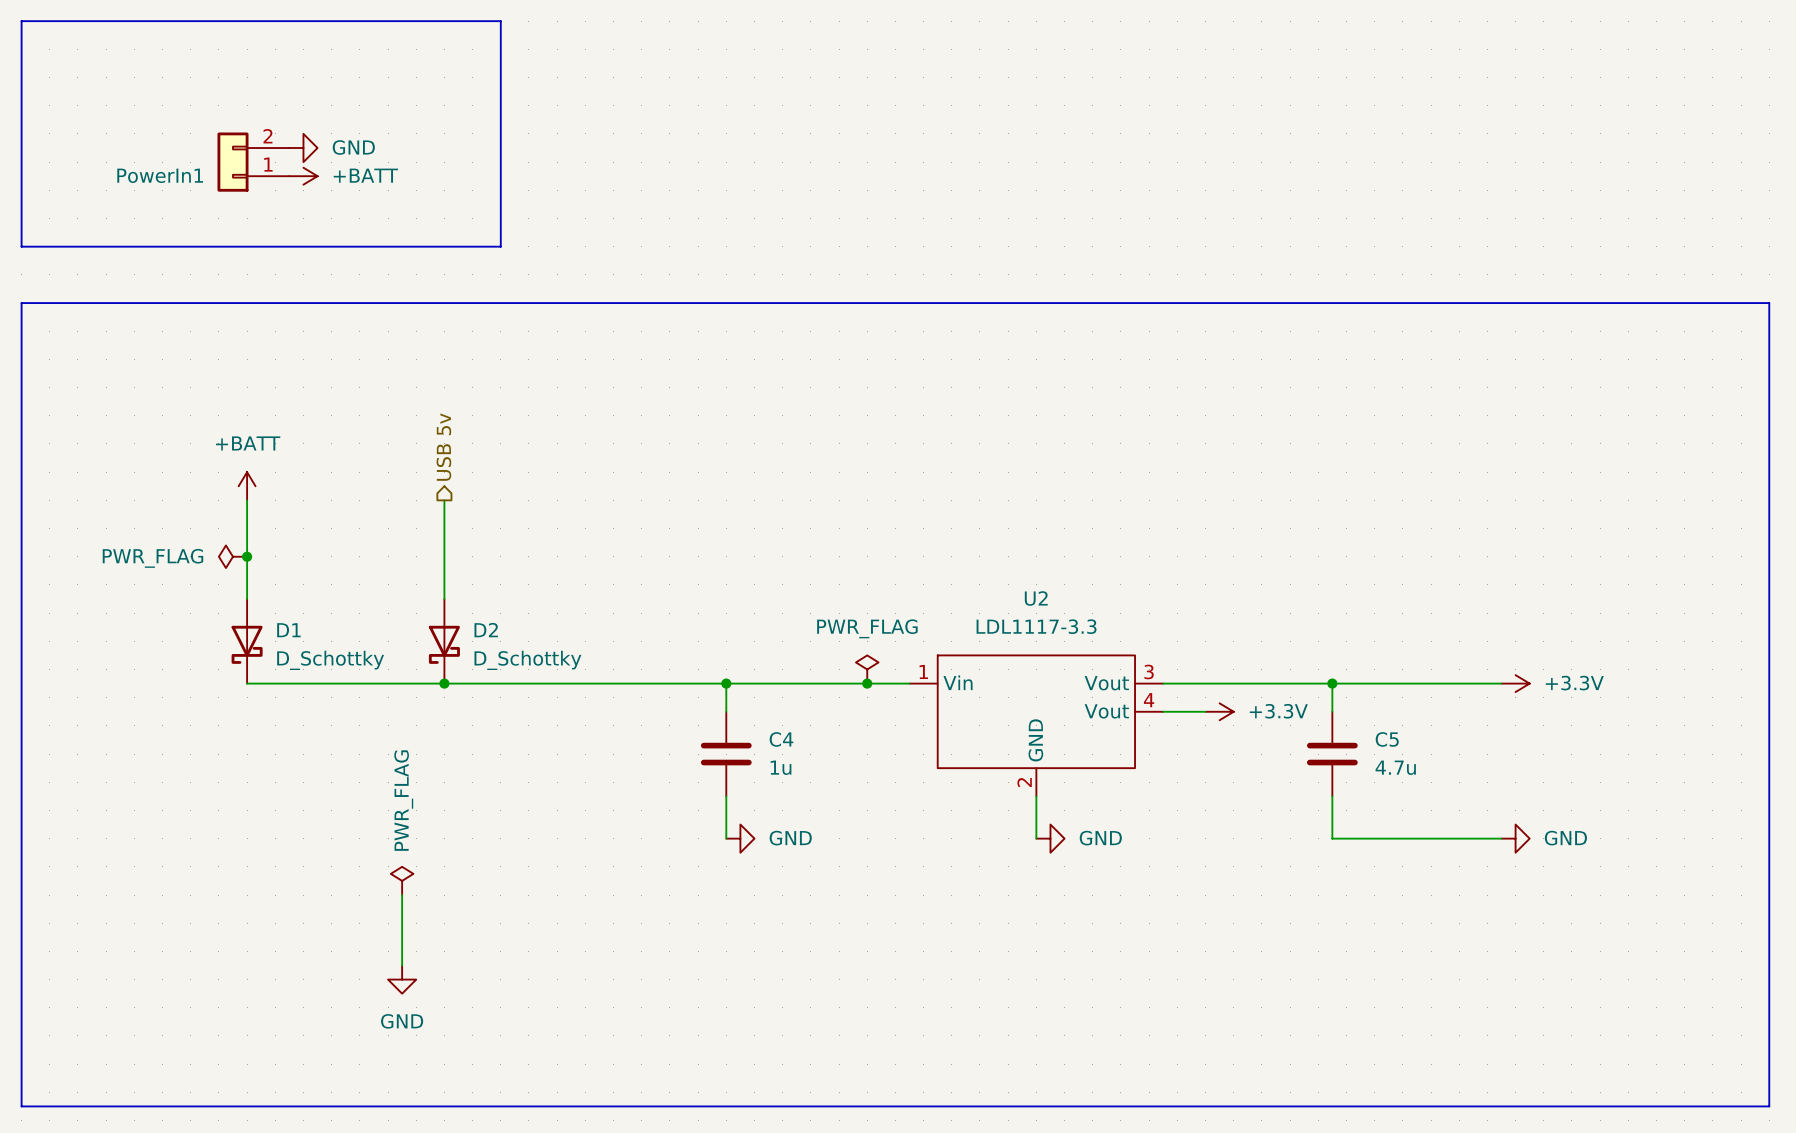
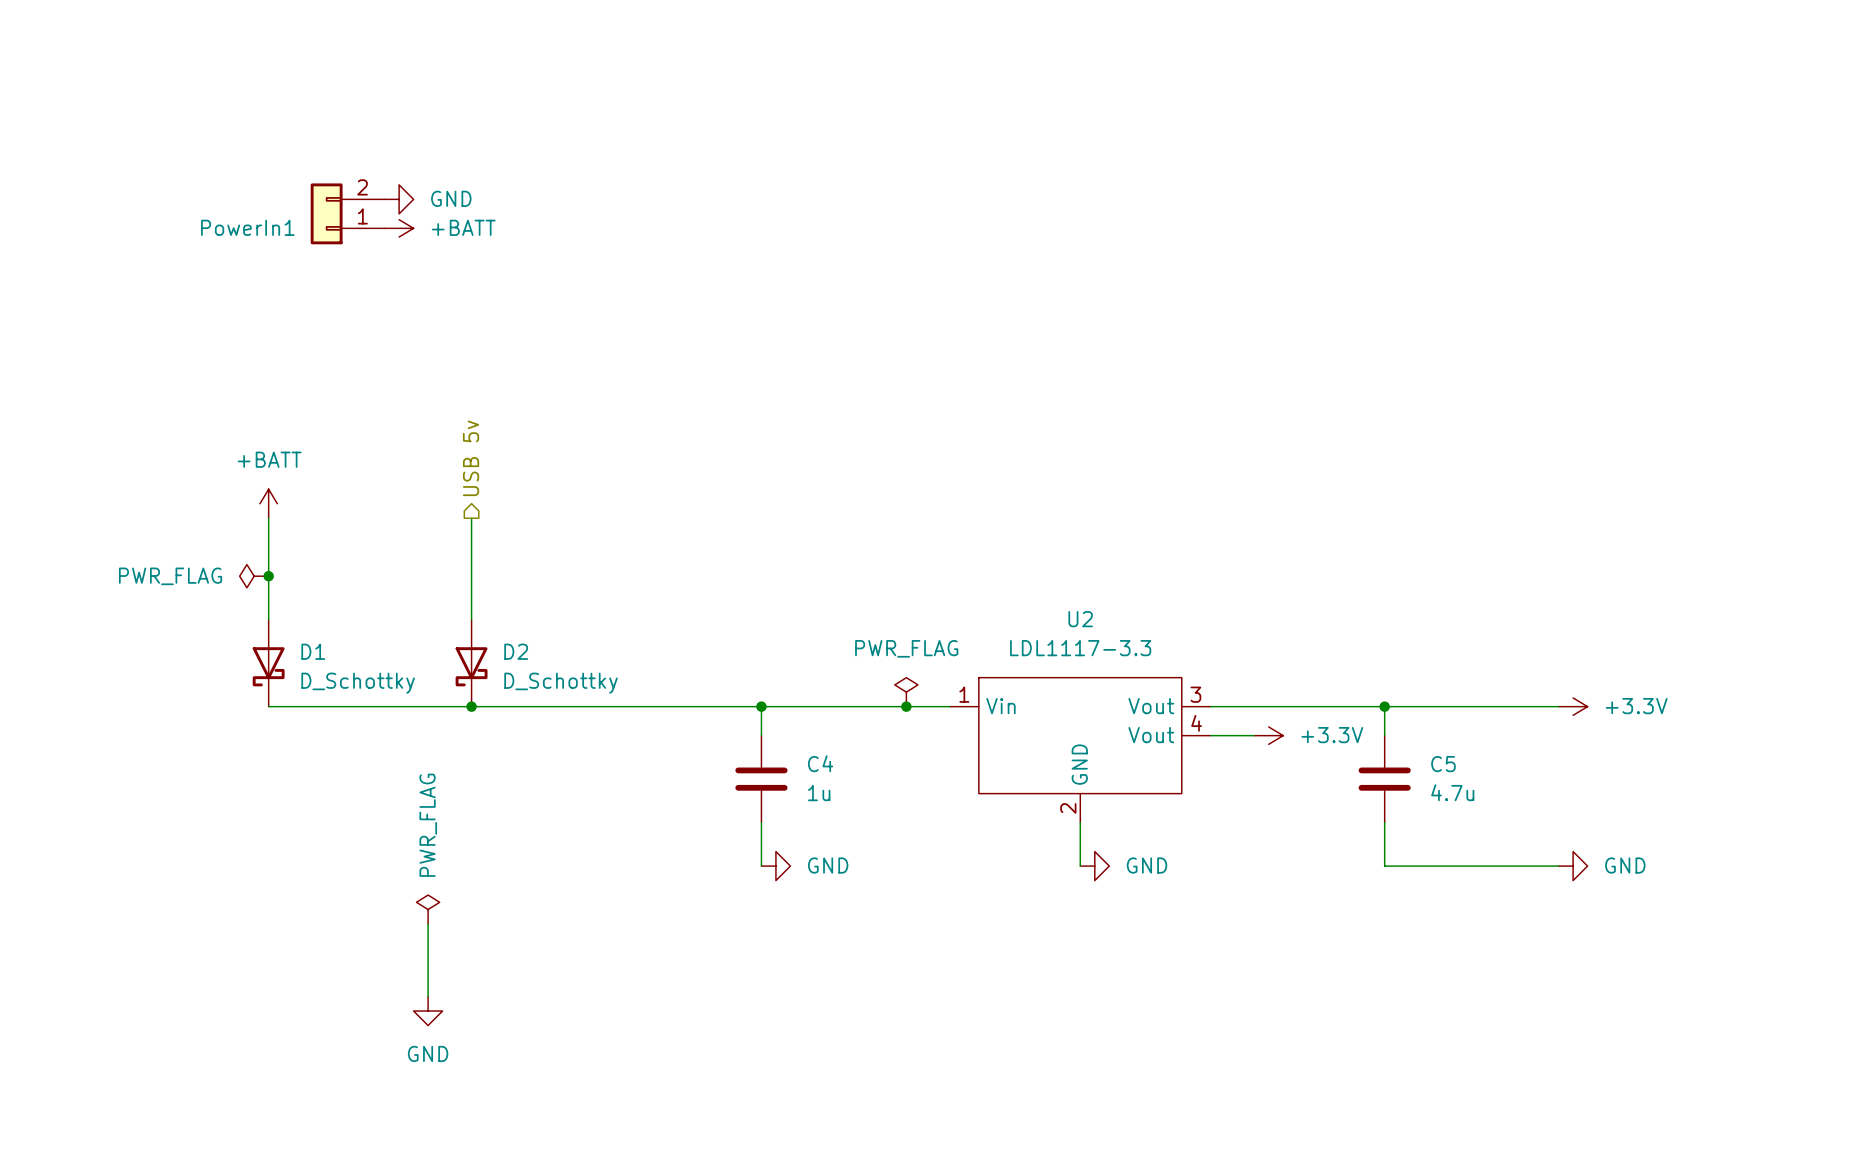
line: (21, 21) (21, 246) (500, 246) (500, 21) (21, 21) -> none
power symbol position: GND (303, 148) -> GND (399, 199)
PowerIn1 position: (253, 162) -> (347, 213)
power symbol position: +BATT (303, 176) -> +BATT (399, 228)
line: (21, 303) (1769, 303) (1769, 1106) (21, 1106) (21, 303) -> none

